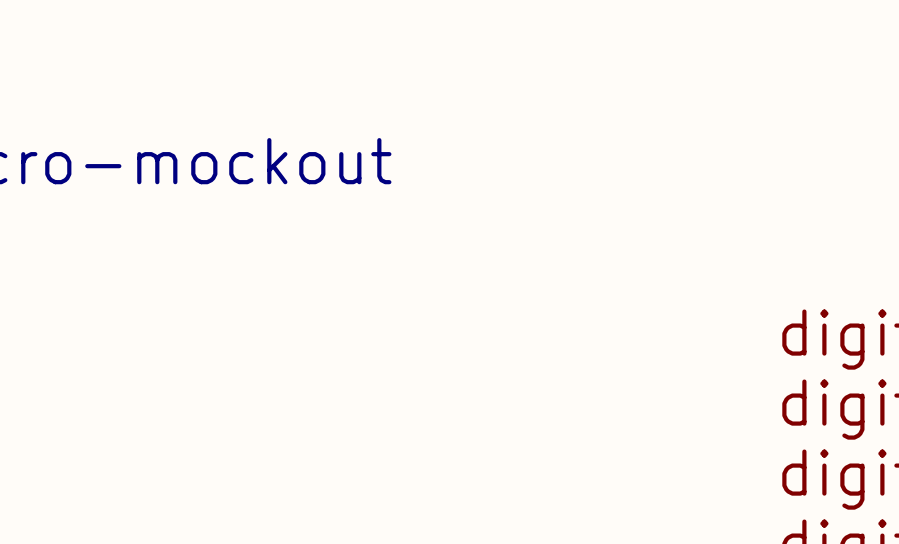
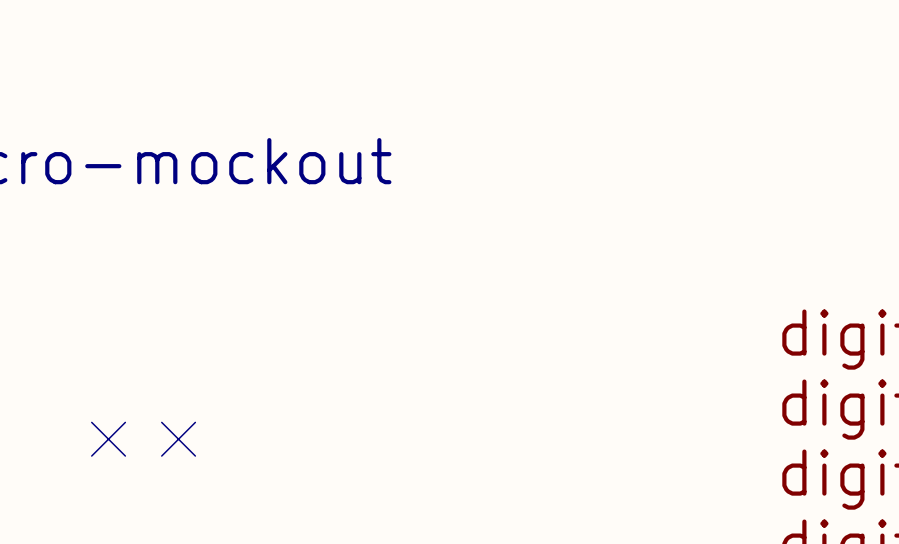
no-connect mark: none -> (108, 439)
no-connect mark: none -> (178, 439)

